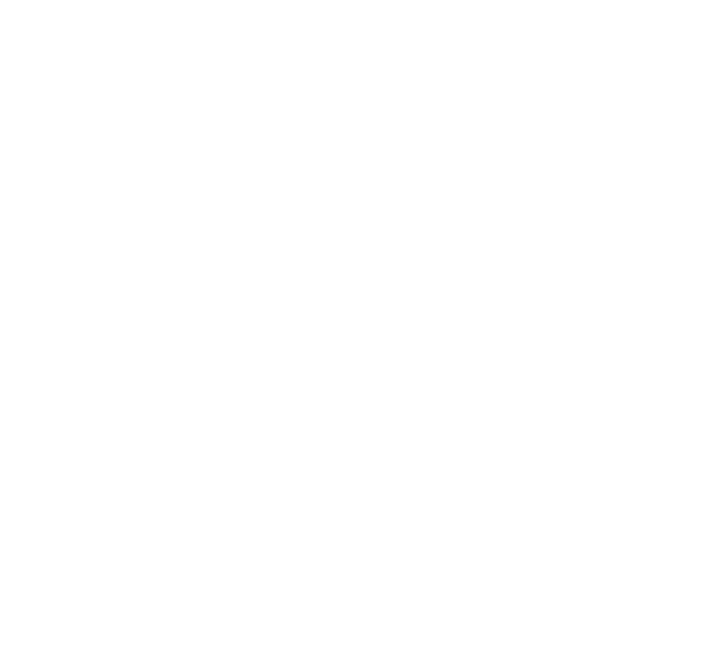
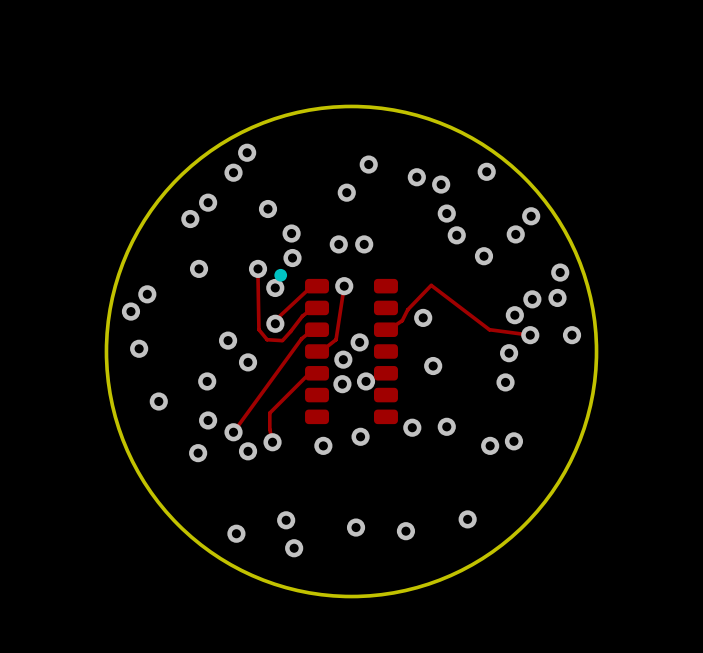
round board edge: none -> [104, 104, 599, 599]
via: none -> (247, 152)
via: none -> (368, 164)
via: none -> (486, 171)
via: none -> (233, 172)
via: none -> (416, 177)
via: none -> (441, 184)
via: none -> (346, 192)
via: none -> (208, 202)
via: none -> (268, 209)
via: none -> (446, 213)
via: none -> (531, 216)
via: none -> (190, 219)
via: none -> (291, 233)
via: none -> (515, 234)
via: none -> (456, 235)
via: none -> (338, 244)
via: none -> (364, 244)
via: none -> (483, 256)
via: none -> (292, 258)
via: none -> (199, 268)
via: none -> (258, 268)
via: none -> (560, 272)
track: none -> (258, 277) (258, 329) (267, 339) (281, 340)
track: none -> (431, 285) (407, 309) (402, 320) (396, 324)
track: none -> (344, 286) (336, 339) (327, 346)
via: none -> (344, 286)
track: none -> (432, 286) (489, 329) (530, 335)
via: none -> (275, 287)
track: none -> (306, 291) (279, 316)
via: none -> (147, 294)
via: none -> (557, 297)
via: none -> (532, 299)
via: none -> (130, 311)
track: none -> (306, 313) (282, 340)
via: none -> (514, 315)
via: none -> (423, 317)
via: none -> (275, 323)
track: none -> (306, 335) (233, 432)
via: none -> (530, 335)
via: none -> (572, 335)
via: none -> (228, 340)
via: none -> (359, 342)
part: none -> (336, 346)
via: none -> (139, 348)
via: none -> (509, 353)
via: none -> (343, 359)
via: none -> (248, 362)
via: none -> (433, 366)
track: none -> (317, 373) (309, 373) (269, 413) (269, 429) (272, 442)
via: none -> (207, 381)
via: none -> (366, 381)
via: none -> (505, 382)
via: none -> (342, 384)
via: none -> (158, 401)
via: none -> (208, 420)
via: none -> (446, 426)
via: none -> (412, 427)
via: none -> (233, 432)
via: none -> (360, 436)
via: none -> (513, 441)
via: none -> (272, 442)
via: none -> (323, 445)
via: none -> (490, 445)
via: none -> (248, 451)
via: none -> (198, 453)
via: none -> (467, 519)
via: none -> (286, 520)
via: none -> (356, 527)
via: none -> (405, 531)
via: none -> (236, 533)
via: none -> (294, 548)

